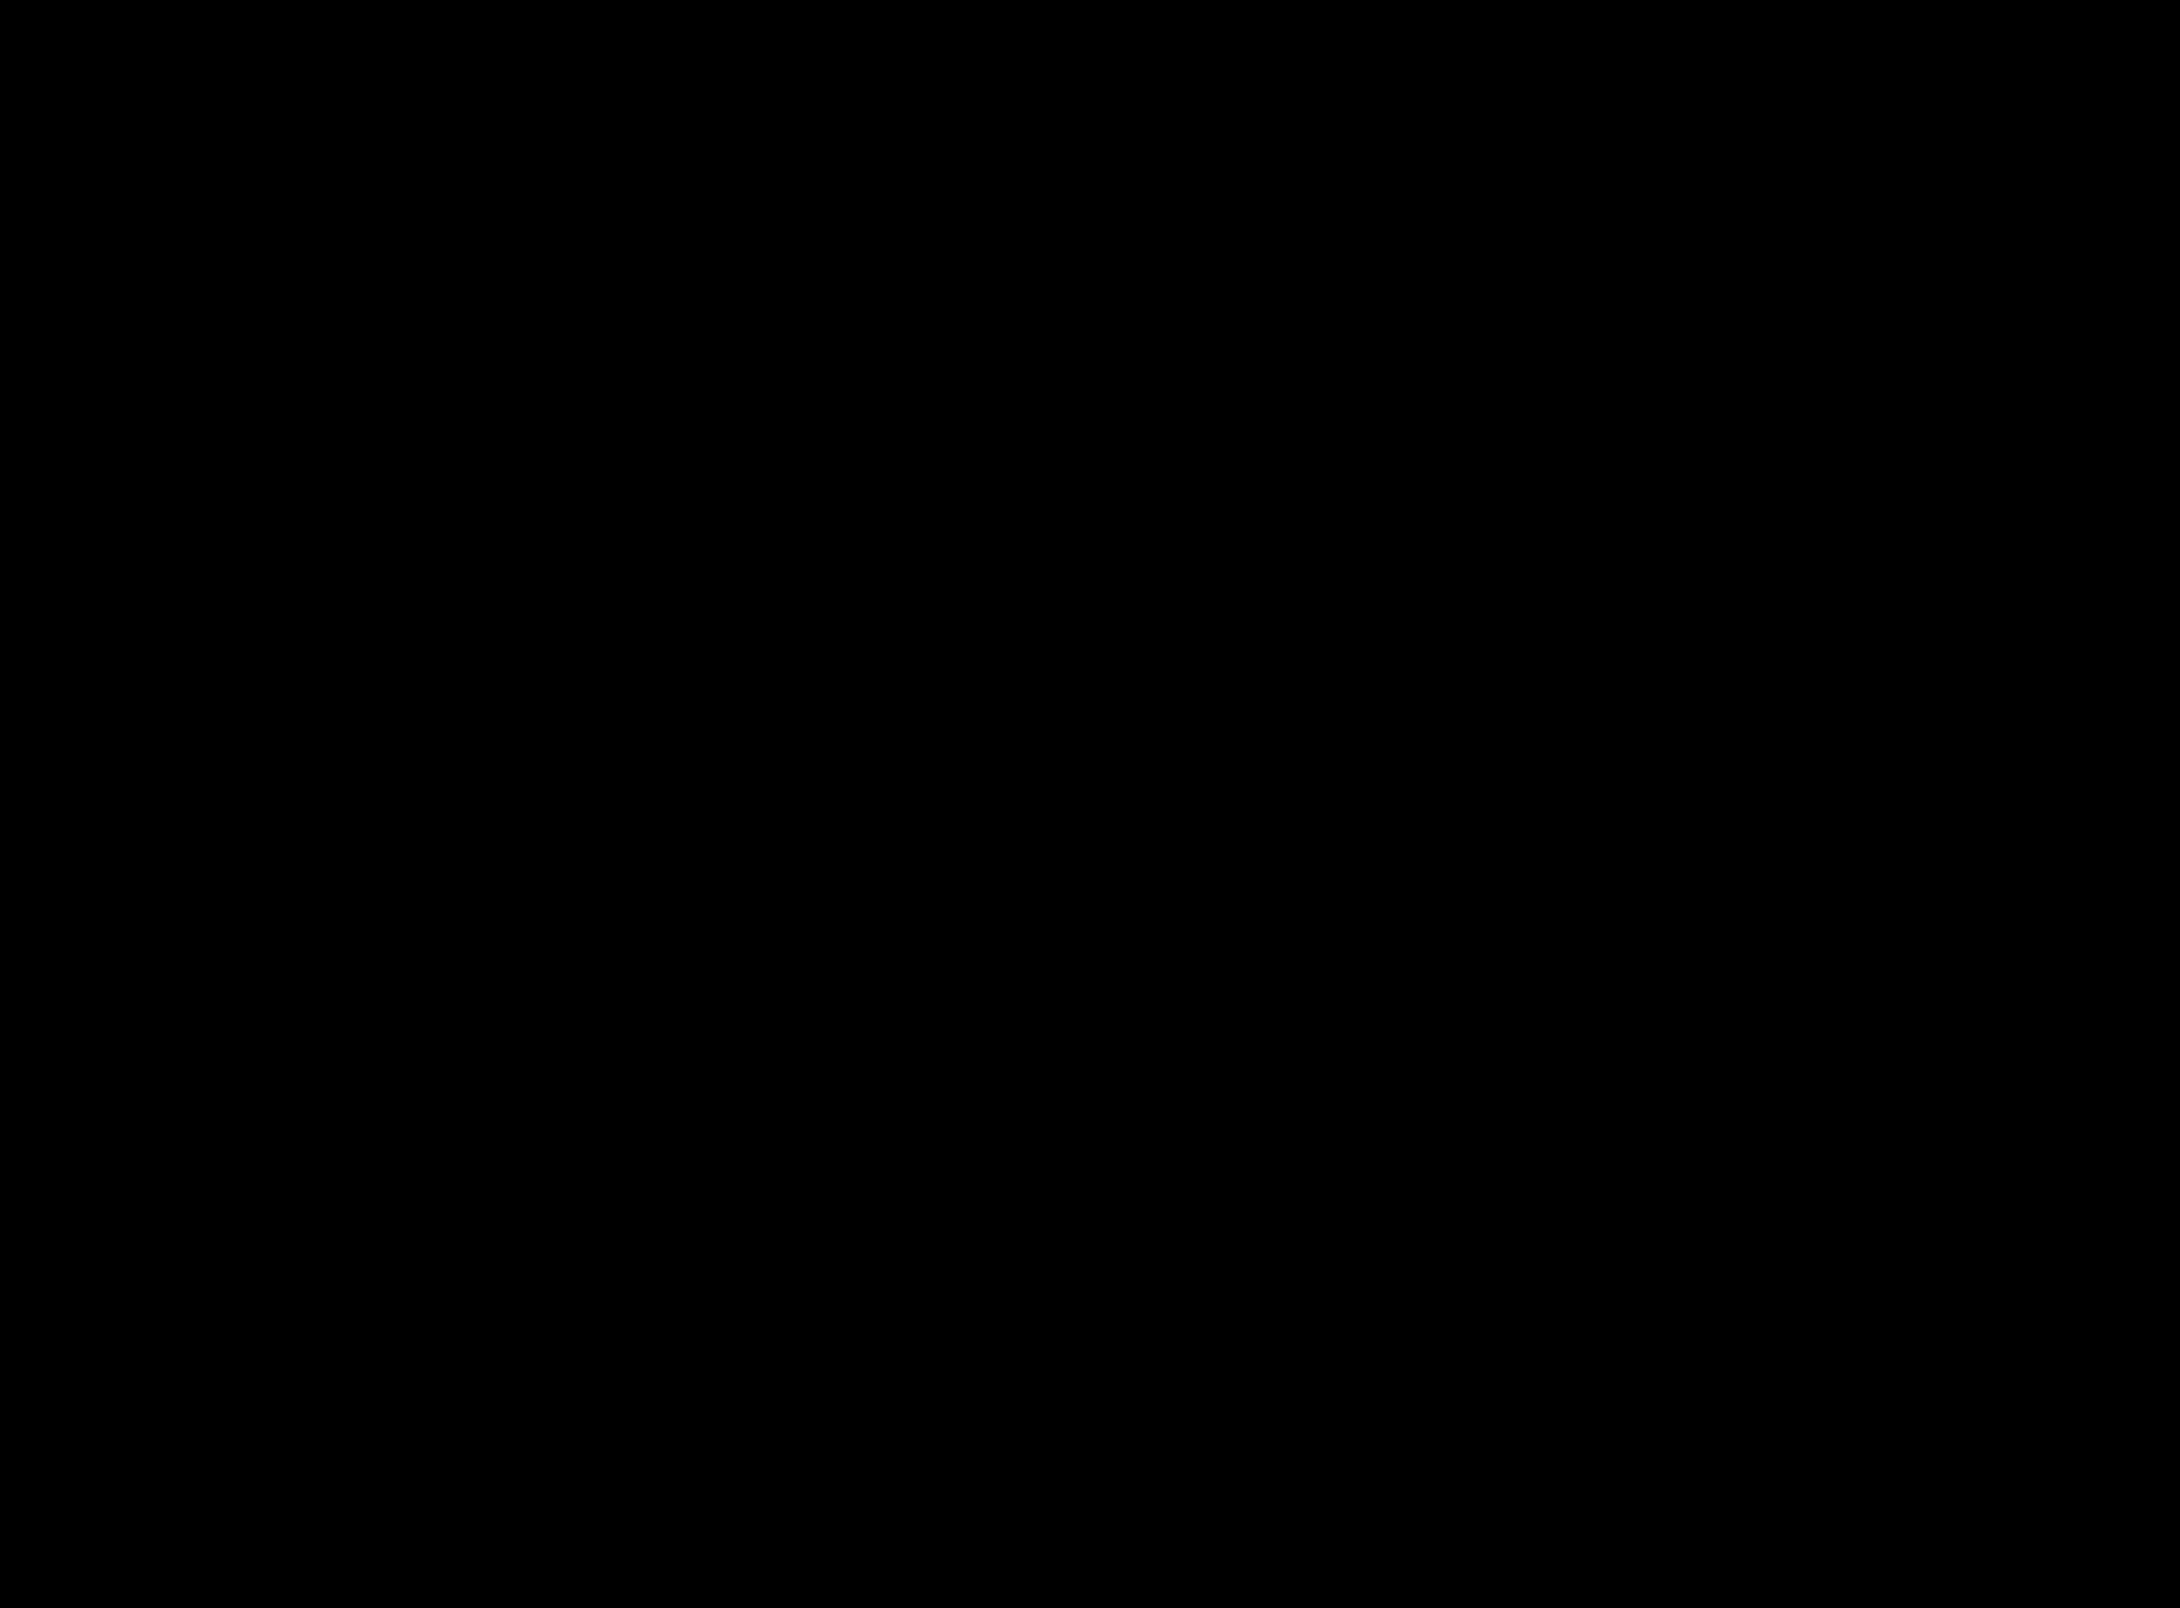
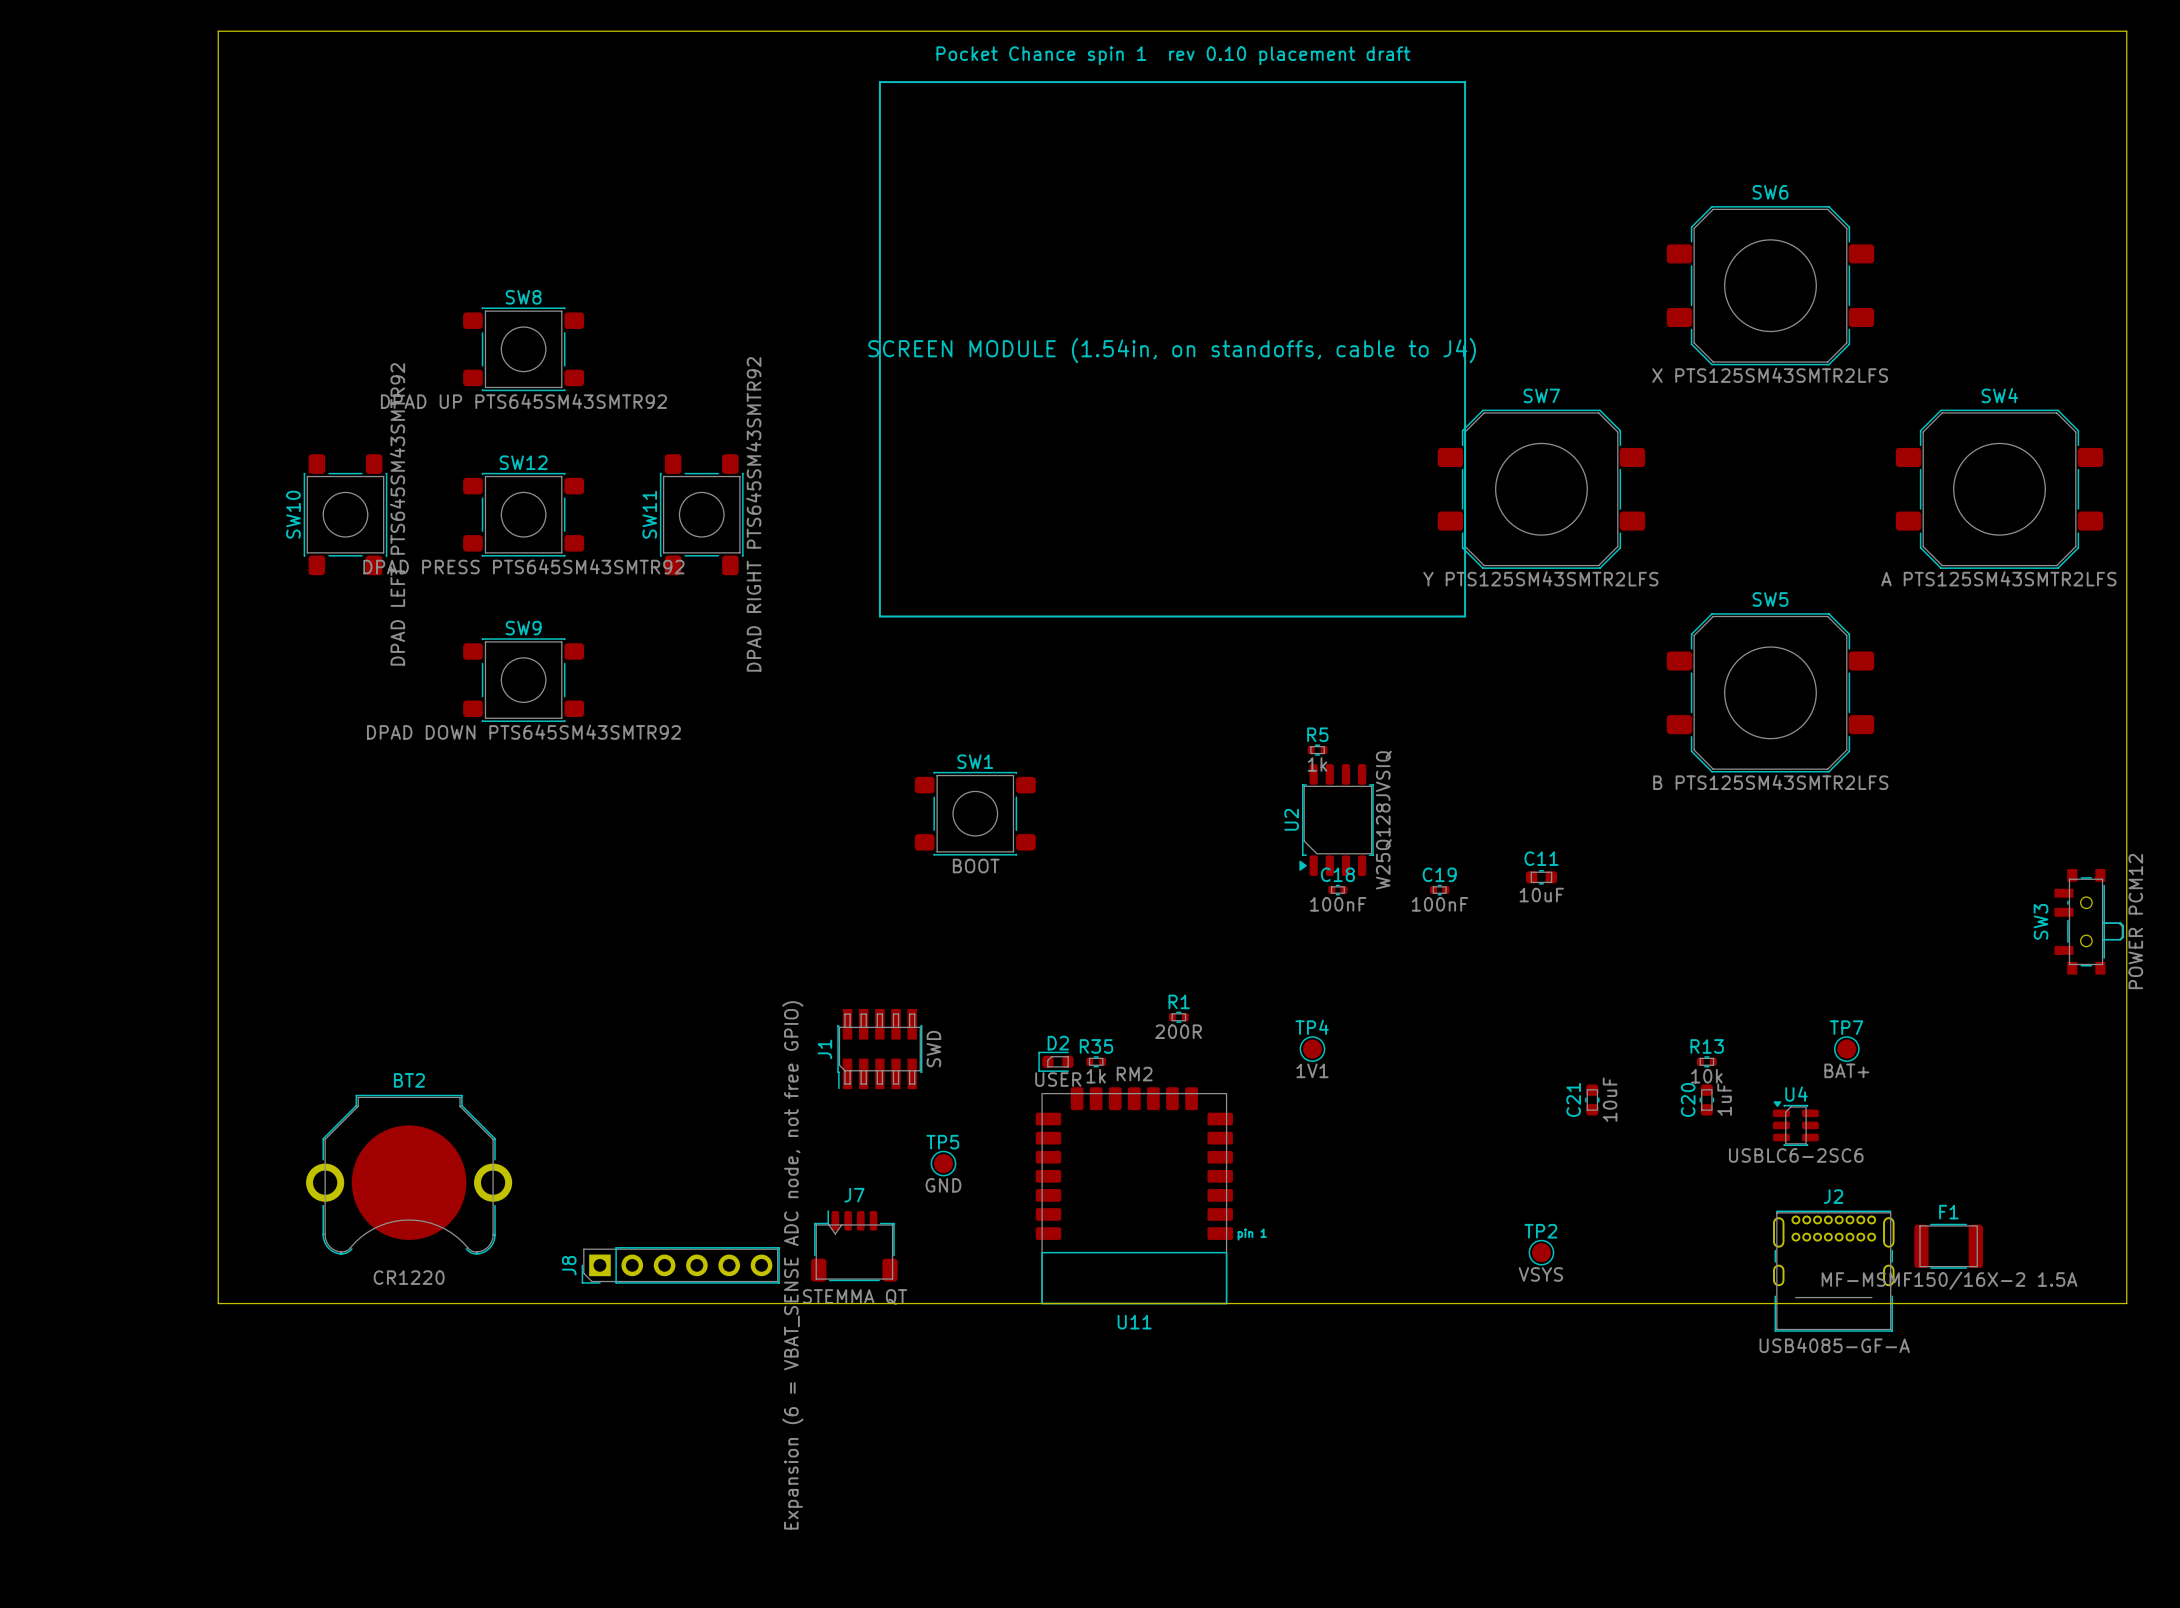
board edge: none -> (218, 31) (2126, 31) (2126, 1303) (218, 1303) (218, 31)
text: none -> Pocket Chance spin 1 rev 0.10 placement draft (1173, 55)
line: none -> (879, 82) (1465, 82) (1465, 616) (879, 616) (879, 82)
SW6: none -> X PTS125SM43SMTR2LFS (1770, 285)
SW8: none -> DPAD UP PTS645SM43SMTR92 (523, 349)
text: none -> SCREEN MODULE (1.54in, on standoffs, cable to J4) (1172, 350)
SW7: none -> Y PTS125SM43SMTR2LFS (1541, 489)
SW4: none -> A PTS125SM43SMTR2LFS (1999, 489)
SW10: none -> DPAD LEFT PTS645SM43SMTR92 (345, 514)
SW12: none -> DPAD PRESS PTS645SM43SMTR92 (523, 514)
SW11: none -> DPAD RIGHT PTS645SM43SMTR92 (701, 514)
SW9: none -> DPAD DOWN PTS645SM43SMTR92 (523, 680)
SW5: none -> B PTS125SM43SMTR2LFS (1770, 692)
R5: none -> 1k (1317, 750)
SW1: none -> BOOT (975, 813)
U2: none -> W25Q128JVSIQ (1336, 820)
C11: none -> 10uF (1541, 877)
C18: none -> 100nF (1337, 890)
C19: none -> 100nF (1439, 890)
SW3: none -> POWER PCM12 (2089, 921)
R1: none -> 200R (1178, 1017)
J1: none -> SWD (879, 1049)
TP4: none -> 1V1 (1312, 1049)
TP7: none -> BAT+ (1846, 1049)
D2: none -> USER (1055, 1061)
R35: none -> 1k (1096, 1061)
R13: none -> 10k (1706, 1061)
C21: none -> 10uF (1592, 1099)
C20: none -> 1uF (1706, 1099)
U4: none -> USBLC6-2SC6 (1795, 1123)
TP5: none -> GND (943, 1163)
BT2: none -> CR1220 (409, 1174)
U11: none -> RM2 (1134, 1195)
J7: none -> STEMMA QT (854, 1245)
F1: none -> MF-MSMF150/16X-2 1.5A (1948, 1246)
TP2: none -> VSYS (1541, 1252)
J8: none -> Expansion (6 = VBAT_SENSE ADC node, not free GPIO) (680, 1265)
J2: none -> USB4085-GF-A (1833, 1271)

